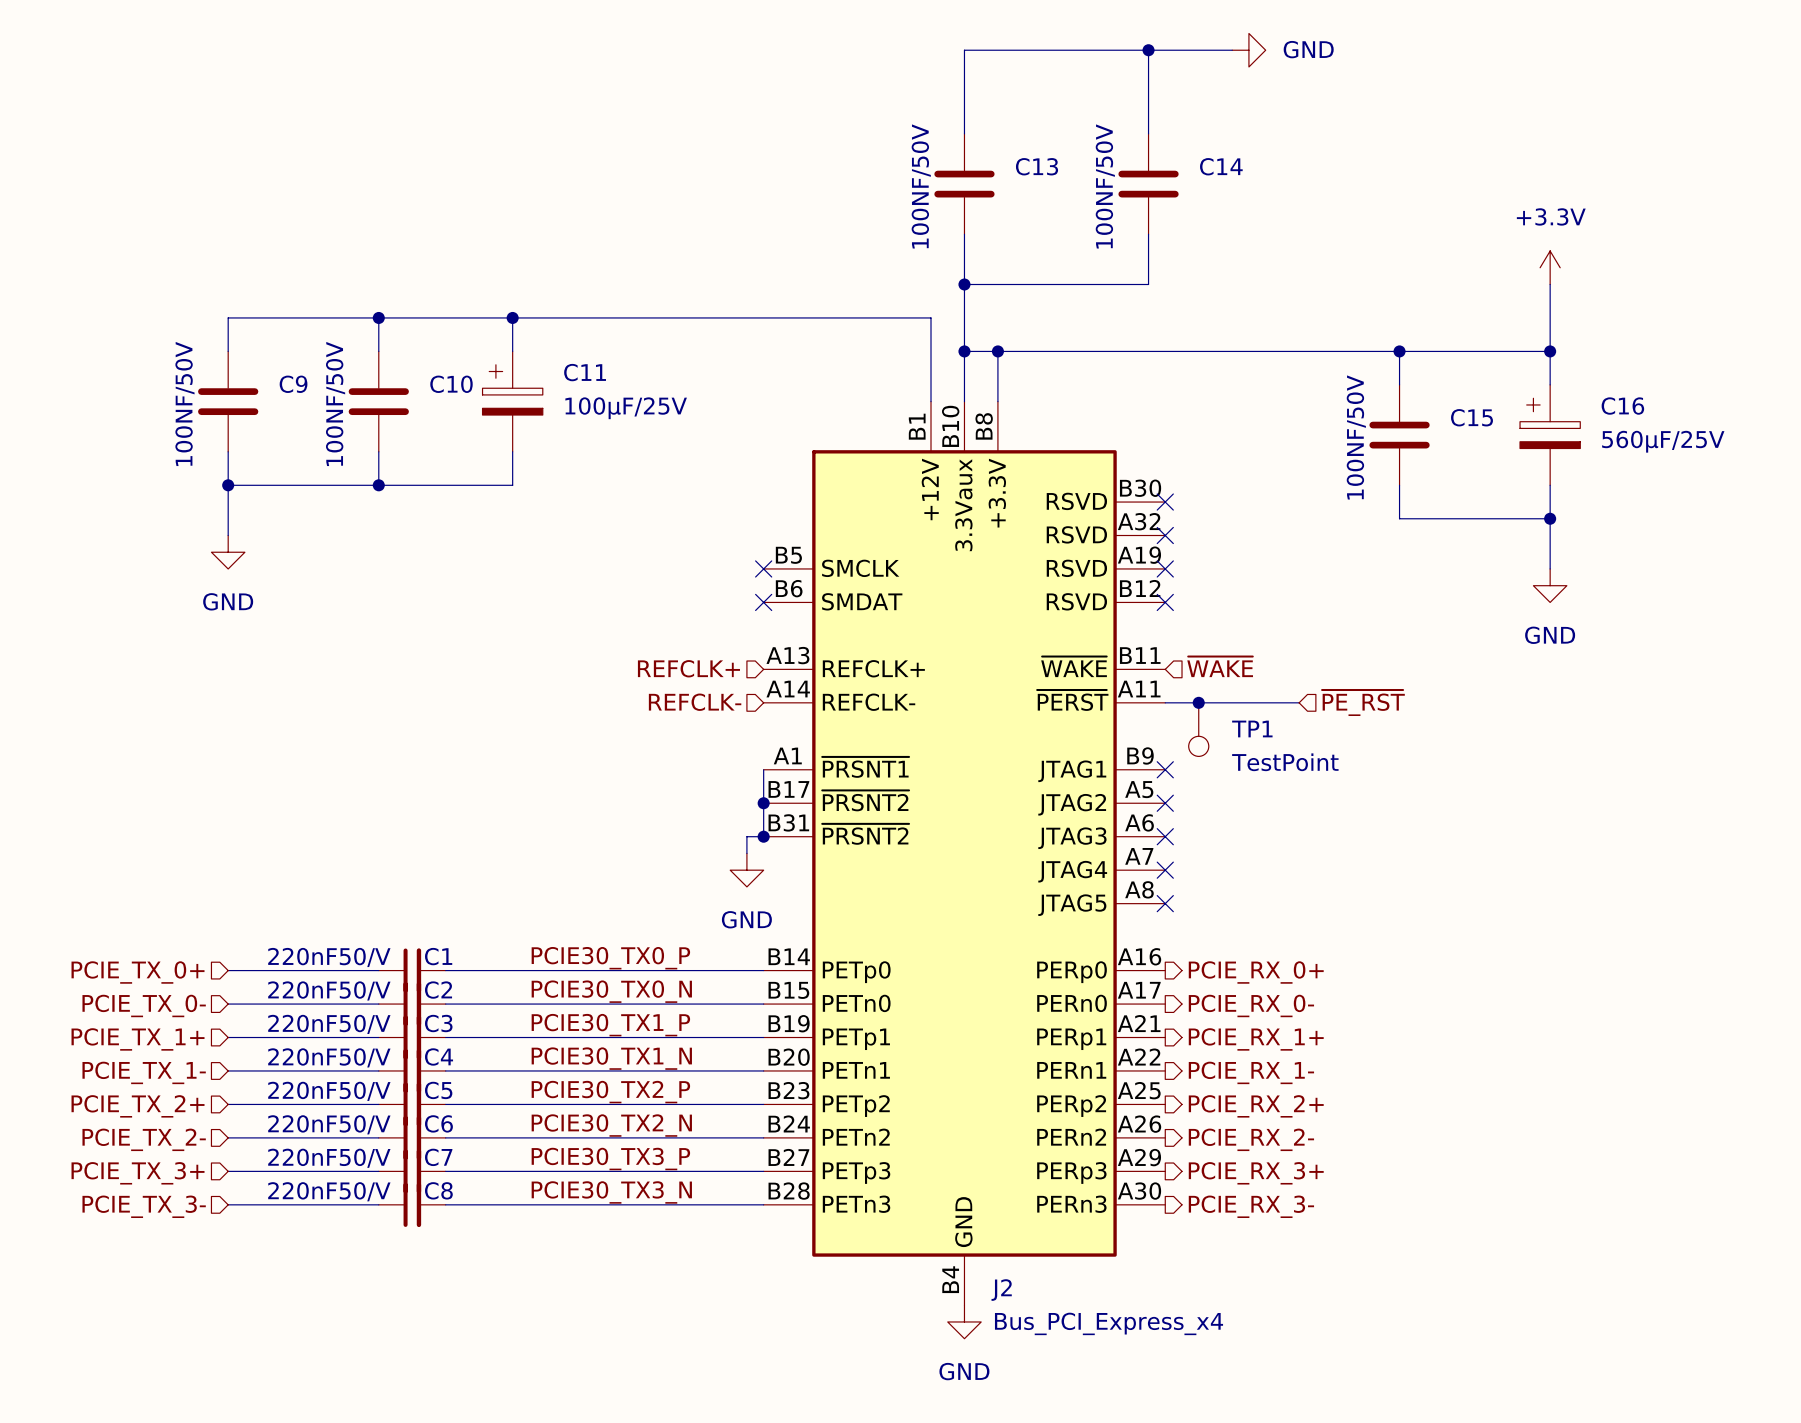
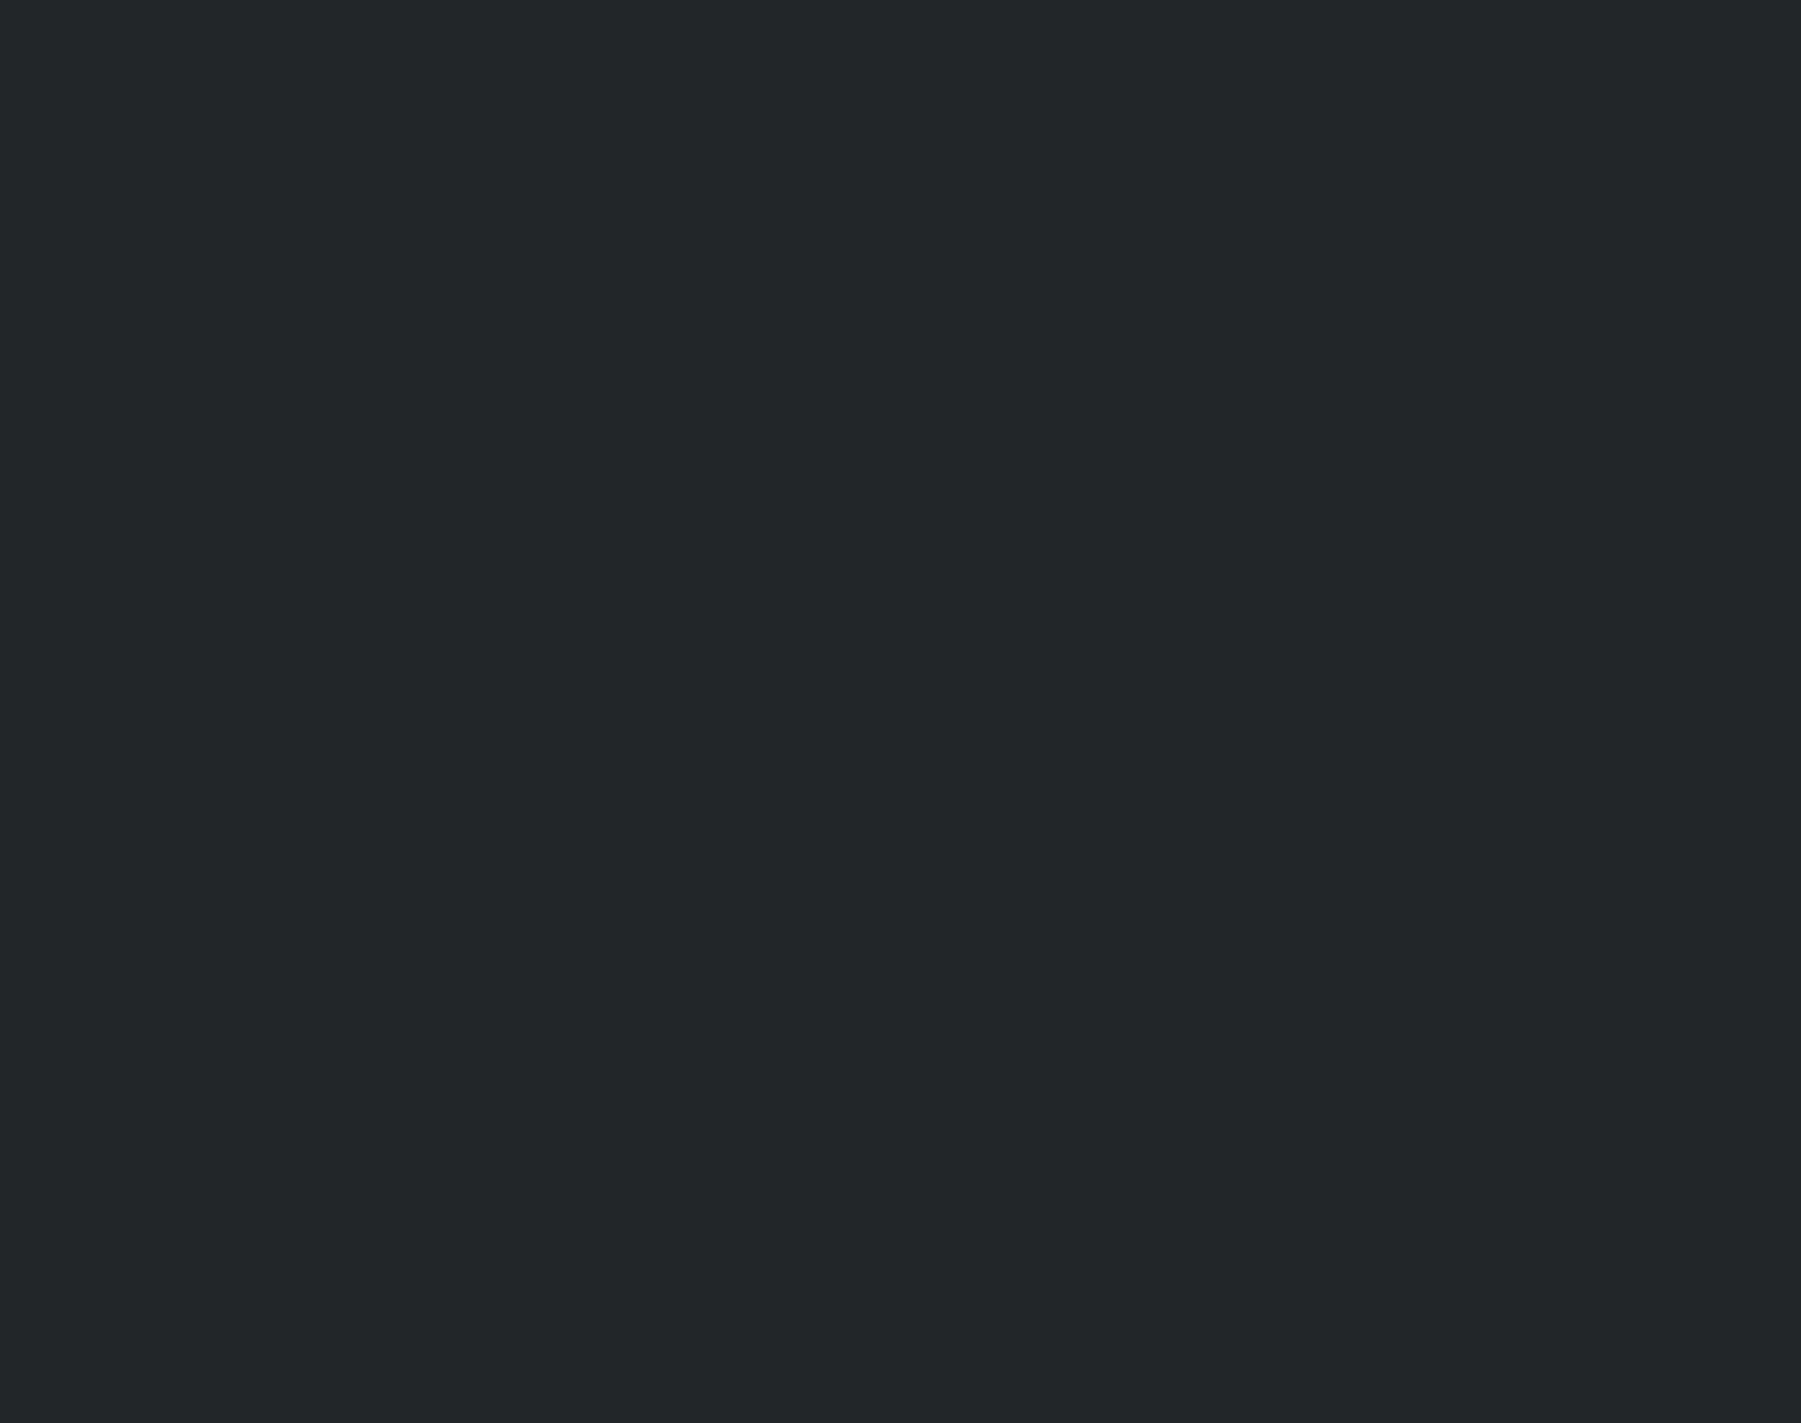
wire: (1148, 50) (1148, 133) -> none
junction: (1148, 50) -> none
wire: (1232, 50) (964, 50) (964, 133) -> none
power symbol: GND (1248, 50) -> none
C13: 100NF/50V (964, 184) -> none
C14: 100NF/50V (1148, 184) -> none
wire: (964, 234) (964, 401) -> none
wire: (1148, 234) (1148, 284) (964, 284) -> none
power symbol: +3.3V (1550, 267) -> none
junction: (964, 284) -> none
wire: (1550, 284) (1550, 384) -> none
wire: (378, 317) (378, 351) -> none
junction: (378, 317) -> none
wire: (512, 317) (512, 351) -> none
junction: (512, 317) -> none
wire: (228, 351) (228, 317) (931, 317) (931, 401) -> none
wire: (964, 351) (1550, 351) -> none
junction: (964, 351) -> none
wire: (997, 351) (997, 401) -> none
junction: (997, 351) -> none
wire: (1399, 351) (1399, 384) -> none
junction: (1399, 351) -> none
junction: (1550, 351) -> none
C9: 100NF/50V (228, 401) -> none
C10: 100NF/50V (378, 401) -> none
C11: 100µF/25V (512, 401) -> none
C15: 100NF/50V (1399, 435) -> none
C16: 560µF/25V (1550, 435) -> none
wire: (228, 451) (228, 535) -> none
wire: (378, 451) (378, 485) -> none
wire: (512, 451) (512, 485) (228, 485) -> none
junction: (228, 485) -> none
junction: (378, 485) -> none
wire: (1399, 485) (1399, 518) (1550, 518) -> none
wire: (1550, 485) (1550, 568) -> none
no-connect mark: (1165, 502) -> none
junction: (1550, 518) -> none
no-connect mark: (1165, 535) -> none
power symbol: GND (228, 552) -> none
no-connect mark: (763, 568) -> none
no-connect mark: (1165, 568) -> none
power symbol: GND (1550, 585) -> none
no-connect mark: (763, 602) -> none
no-connect mark: (1165, 602) -> none
hierarchical label: ~{WAKE} (1220, 666) -> none
hierarchical label: REFCLK+ (688, 668) -> none
hierarchical label: REFCLK- (695, 702) -> none
wire: (1165, 702) (1299, 702) -> none
junction: (1198, 702) -> none
hierarchical label: ~{PE_RST} (1363, 702) -> none
TP1: TestPoint (1198, 729) -> none
wire: (763, 769) (763, 836) (746, 836) (746, 853) -> none
no-connect mark: (1165, 769) -> none
junction: (763, 803) -> none
no-connect mark: (1165, 803) -> none
junction: (763, 836) -> none
no-connect mark: (1165, 836) -> none
J2: Bus_PCI_Express_x4 (964, 853) -> none
power symbol: GND (746, 870) -> none
no-connect mark: (1165, 870) -> none
no-connect mark: (1165, 903) -> none
label: PCIE30_TX0_P (610, 958) -> none
wire: (228, 970) (378, 970) -> none
C1: 220nF50/V (412, 970) -> none
wire: (445, 970) (763, 970) -> none
hierarchical label: PCIE_TX_0+ (138, 972) -> none
hierarchical label: PCIE_RX_0+ (1256, 972) -> none
label: PCIE30_TX0_N (611, 991) -> none
wire: (228, 1004) (378, 1004) -> none
C2: 220nF50/V (412, 1004) -> none
wire: (445, 1004) (763, 1004) -> none
hierarchical label: PCIE_TX_0- (144, 1005) -> none
hierarchical label: PCIE_RX_0- (1251, 1005) -> none
label: PCIE30_TX1_P (610, 1025) -> none
wire: (228, 1037) (378, 1037) -> none
C3: 220nF50/V (412, 1037) -> none
wire: (445, 1037) (763, 1037) -> none
hierarchical label: PCIE_TX_1+ (138, 1039) -> none
hierarchical label: PCIE_RX_1+ (1256, 1039) -> none
label: PCIE30_TX1_N (611, 1058) -> none
wire: (228, 1070) (378, 1070) -> none
C4: 220nF50/V (412, 1070) -> none
wire: (445, 1070) (763, 1070) -> none
hierarchical label: PCIE_TX_1- (144, 1072) -> none
hierarchical label: PCIE_RX_1- (1251, 1072) -> none
label: PCIE30_TX2_P (610, 1092) -> none
wire: (228, 1104) (378, 1104) -> none
C5: 220nF50/V (412, 1104) -> none
wire: (445, 1104) (763, 1104) -> none
hierarchical label: PCIE_TX_2+ (138, 1106) -> none
hierarchical label: PCIE_RX_2+ (1256, 1106) -> none
label: PCIE30_TX2_N (611, 1125) -> none
wire: (228, 1137) (378, 1137) -> none
C6: 220nF50/V (412, 1137) -> none
wire: (445, 1137) (763, 1137) -> none
hierarchical label: PCIE_TX_2- (144, 1139) -> none
hierarchical label: PCIE_RX_2- (1251, 1139) -> none
label: PCIE30_TX3_P (610, 1159) -> none
wire: (228, 1171) (378, 1171) -> none
C7: 220nF50/V (412, 1171) -> none
wire: (445, 1171) (763, 1171) -> none
hierarchical label: PCIE_TX_3+ (138, 1173) -> none
hierarchical label: PCIE_RX_3+ (1256, 1173) -> none
label: PCIE30_TX3_N (611, 1192) -> none
wire: (228, 1204) (378, 1204) -> none
C8: 220nF50/V (412, 1204) -> none
wire: (445, 1204) (763, 1204) -> none
hierarchical label: PCIE_TX_3- (144, 1206) -> none
hierarchical label: PCIE_RX_3- (1251, 1206) -> none
power symbol: GND (964, 1321) -> none

